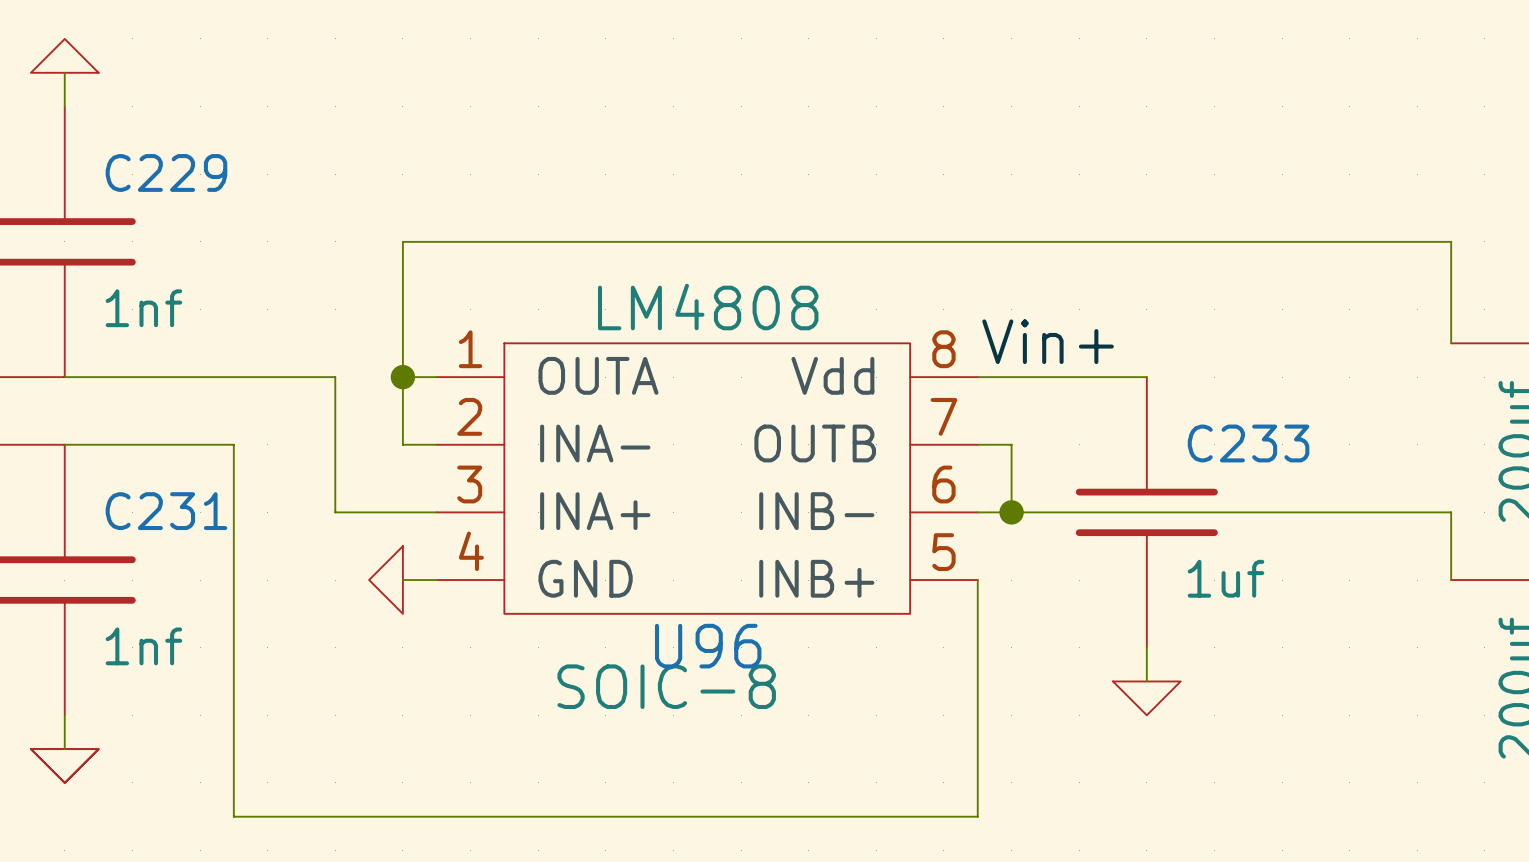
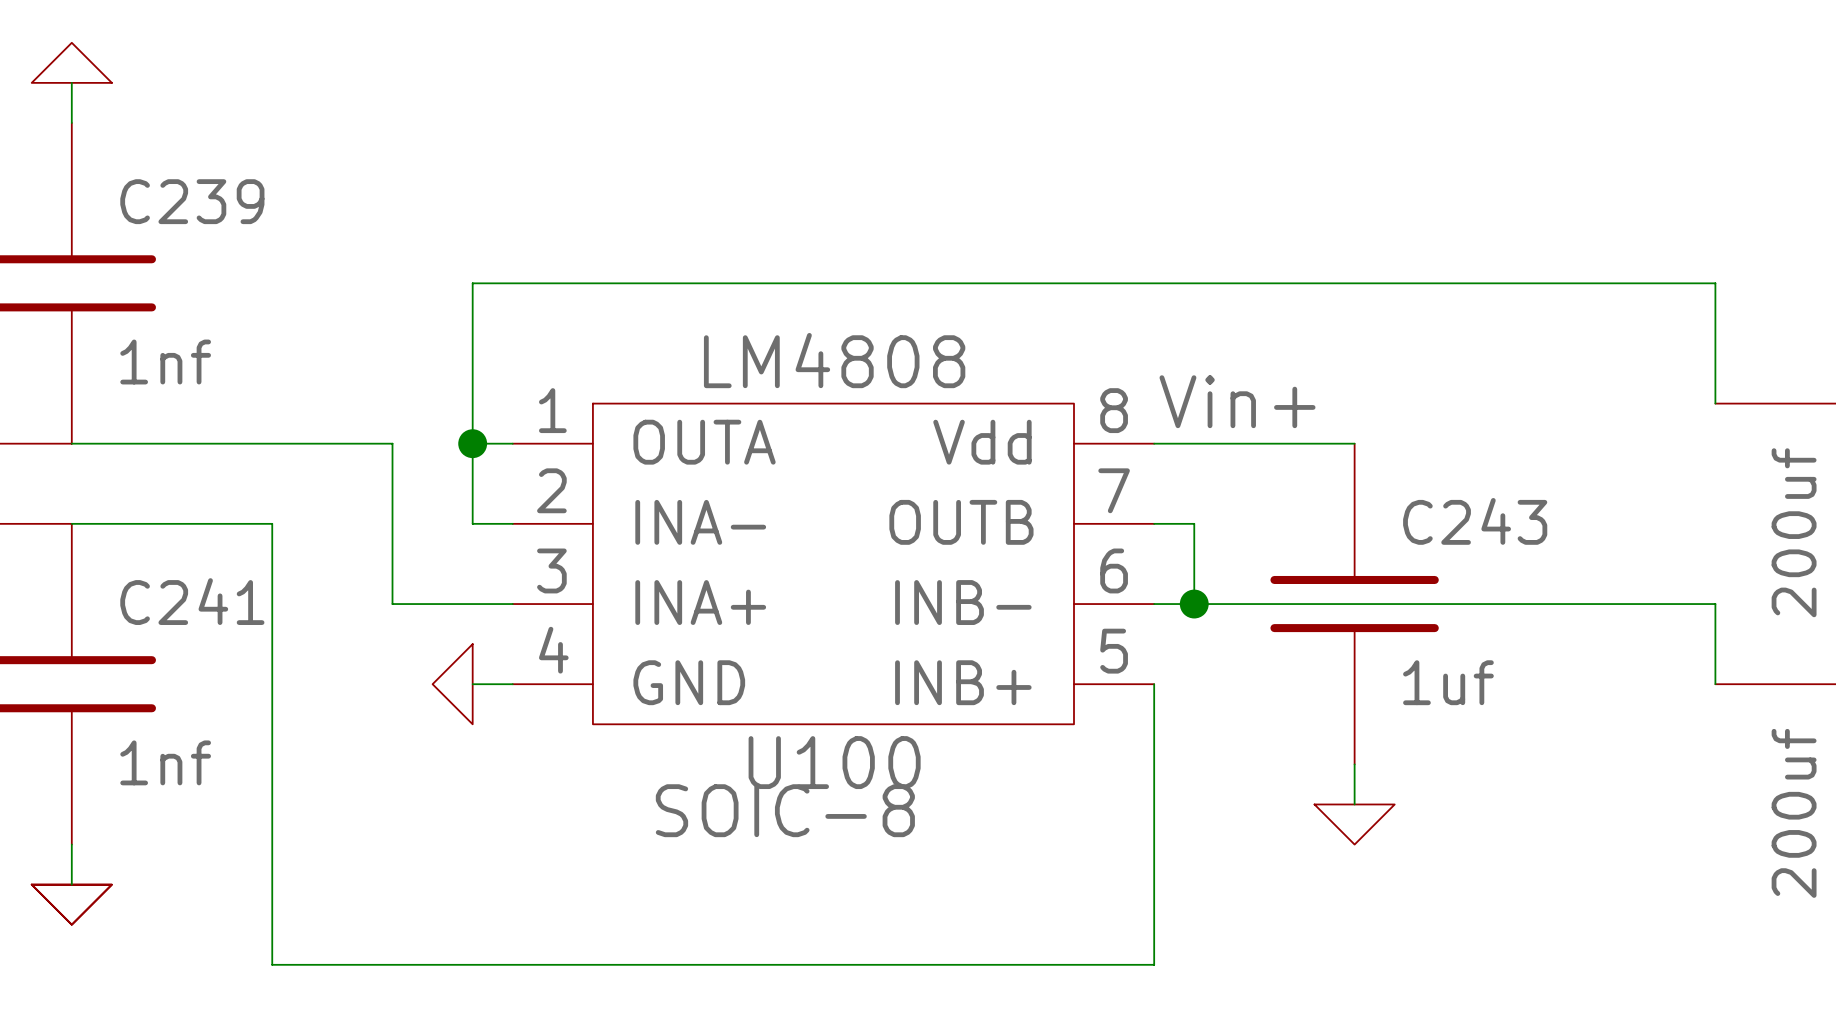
C229 name: C229 (166, 172) -> C239 (192, 201)
C233 name: C233 (1248, 443) -> C243 (1475, 521)
C231 name: C231 (166, 511) -> C241 (192, 601)
U96 name: U96 (708, 646) -> U100 (834, 762)

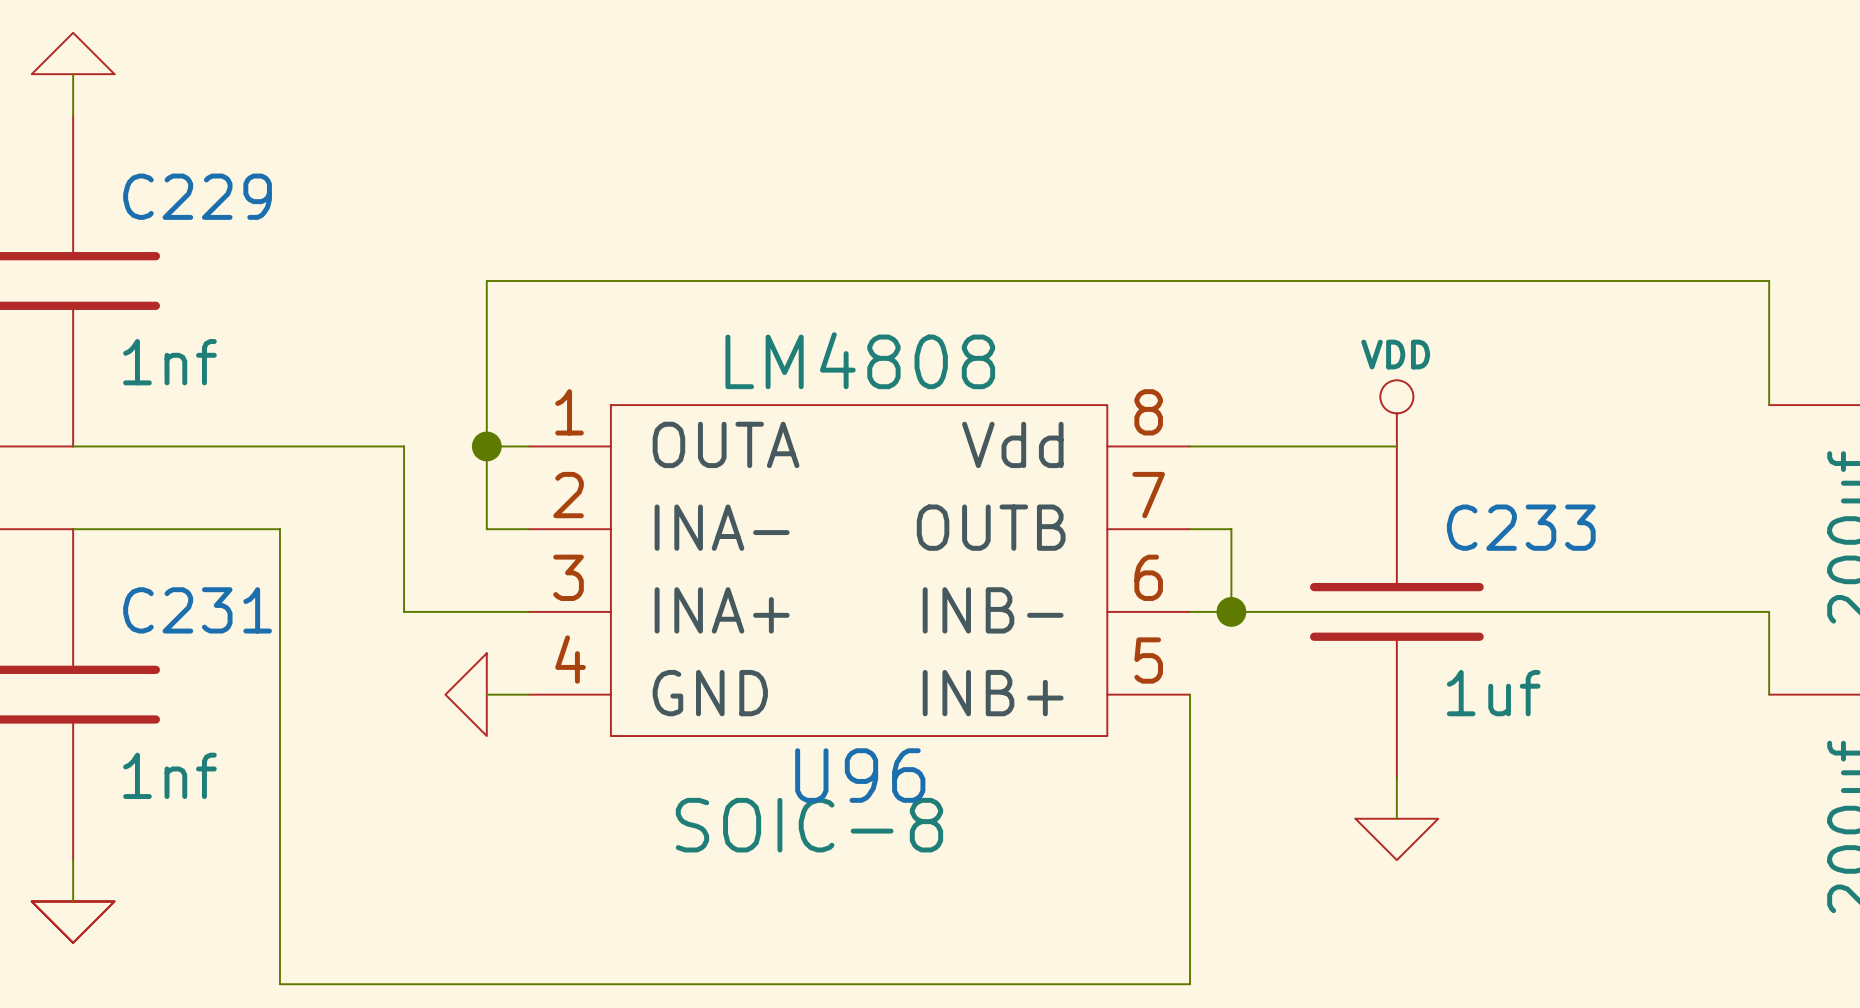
C239 name: C239 (192, 201) -> C229 (197, 196)
label: Vin+ (1237, 401) -> none
power symbol: none -> VDD (1396, 413)
C243 name: C243 (1475, 521) -> C233 (1521, 527)
C241 name: C241 (192, 601) -> C231 (197, 610)
U100 name: U100 (834, 762) -> U96 (860, 775)

